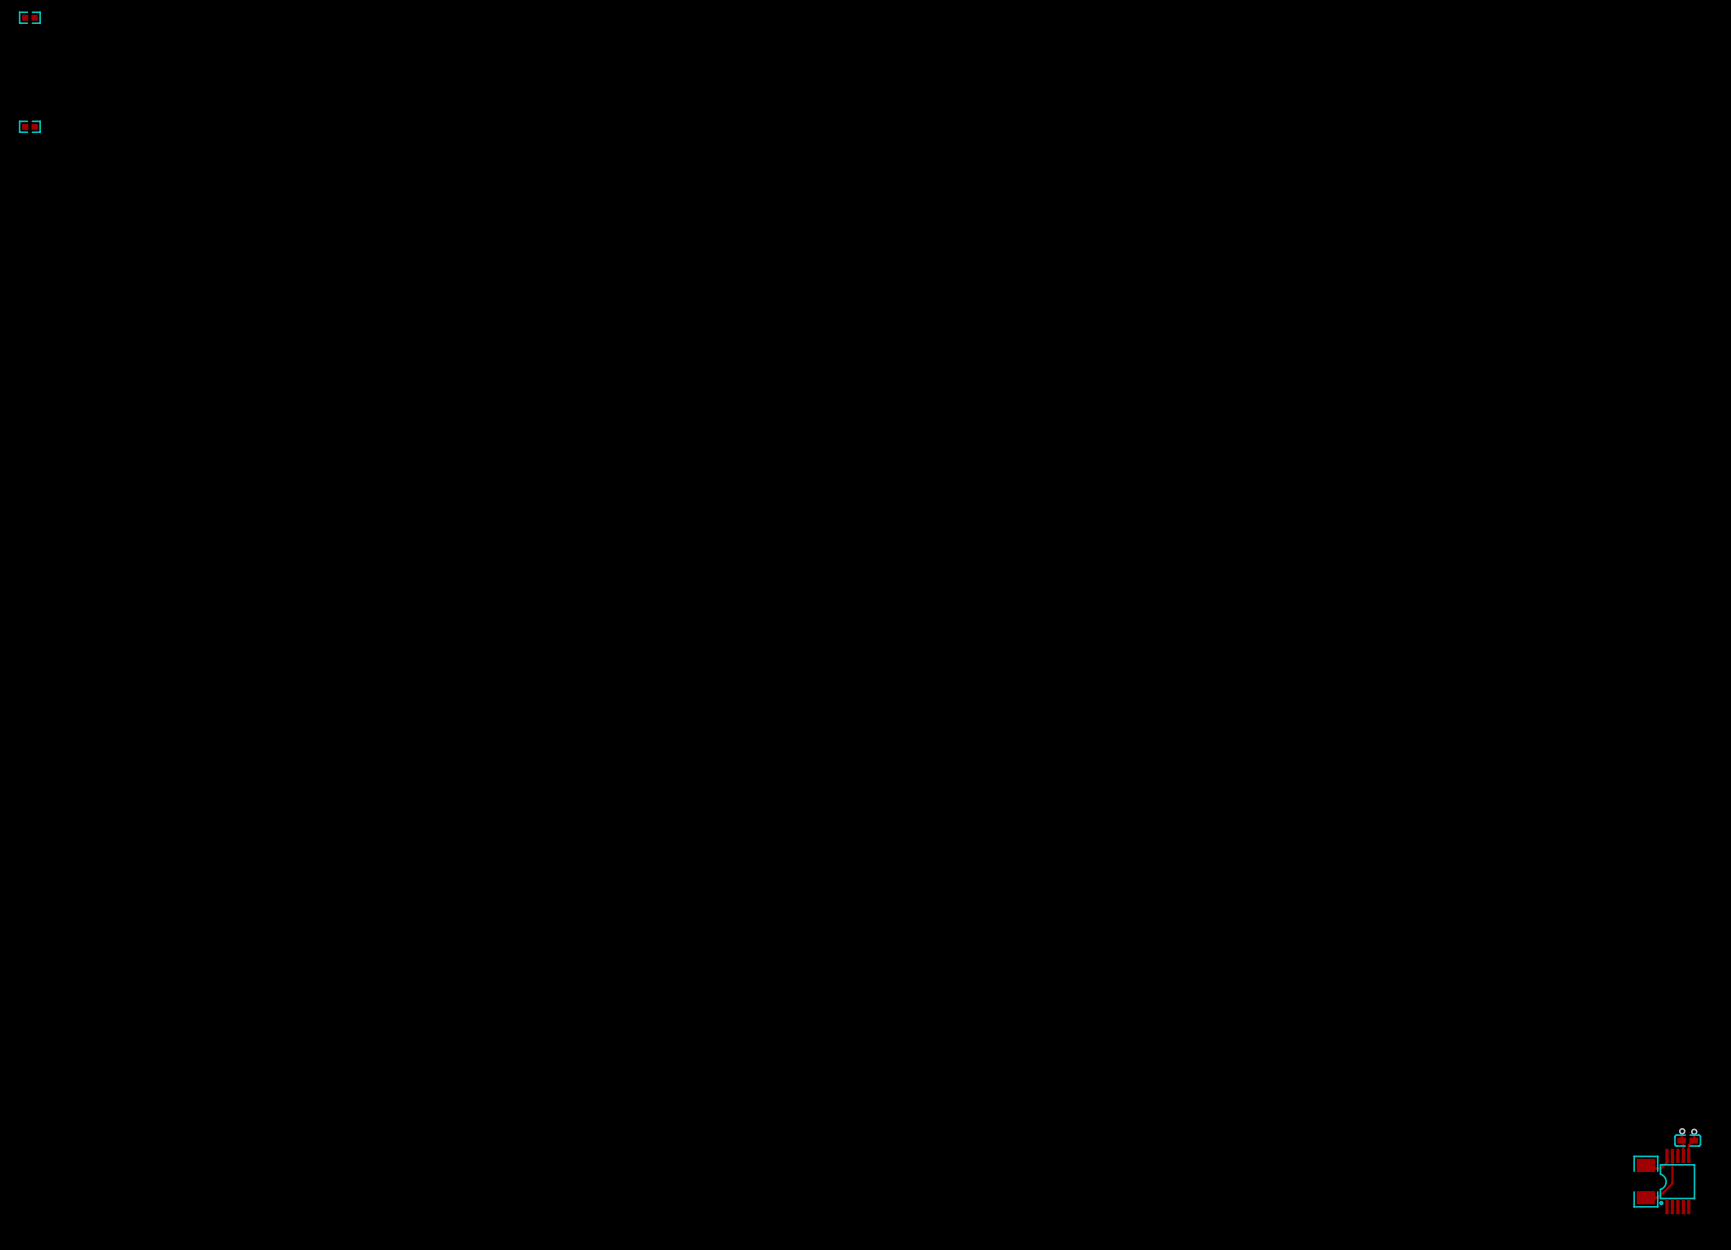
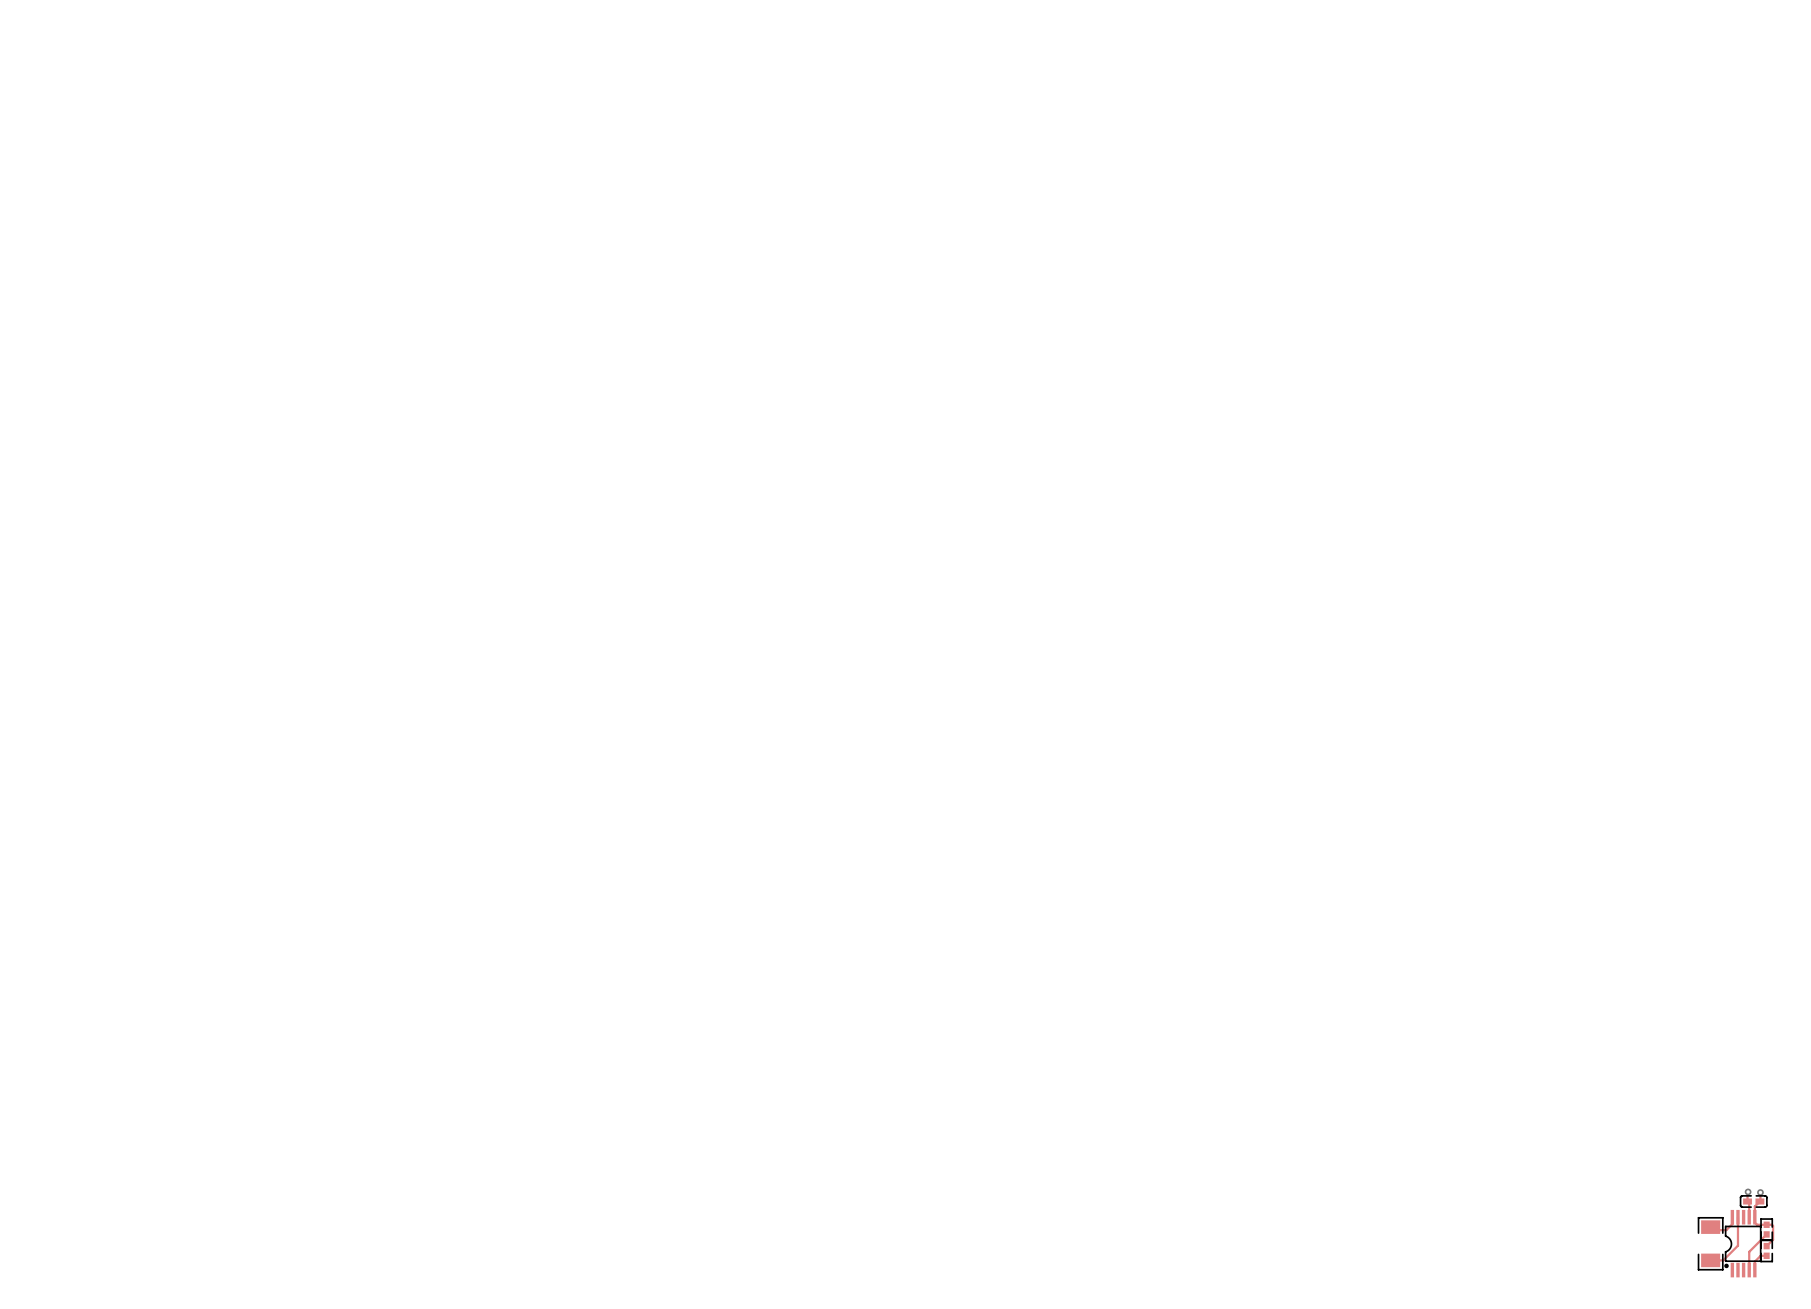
part: (29, 17) -> none
part: (29, 126) -> none
top track: none -> (1754, 1217) (1756, 1224) (1773, 1225) (1773, 1239) (1766, 1246)
part: none -> (1766, 1229)
top track: none -> (1766, 1234) (1749, 1251) (1749, 1270)
part: none -> (1766, 1250)
top track: none -> (1766, 1255) (1760, 1255) (1754, 1261) (1754, 1270)

